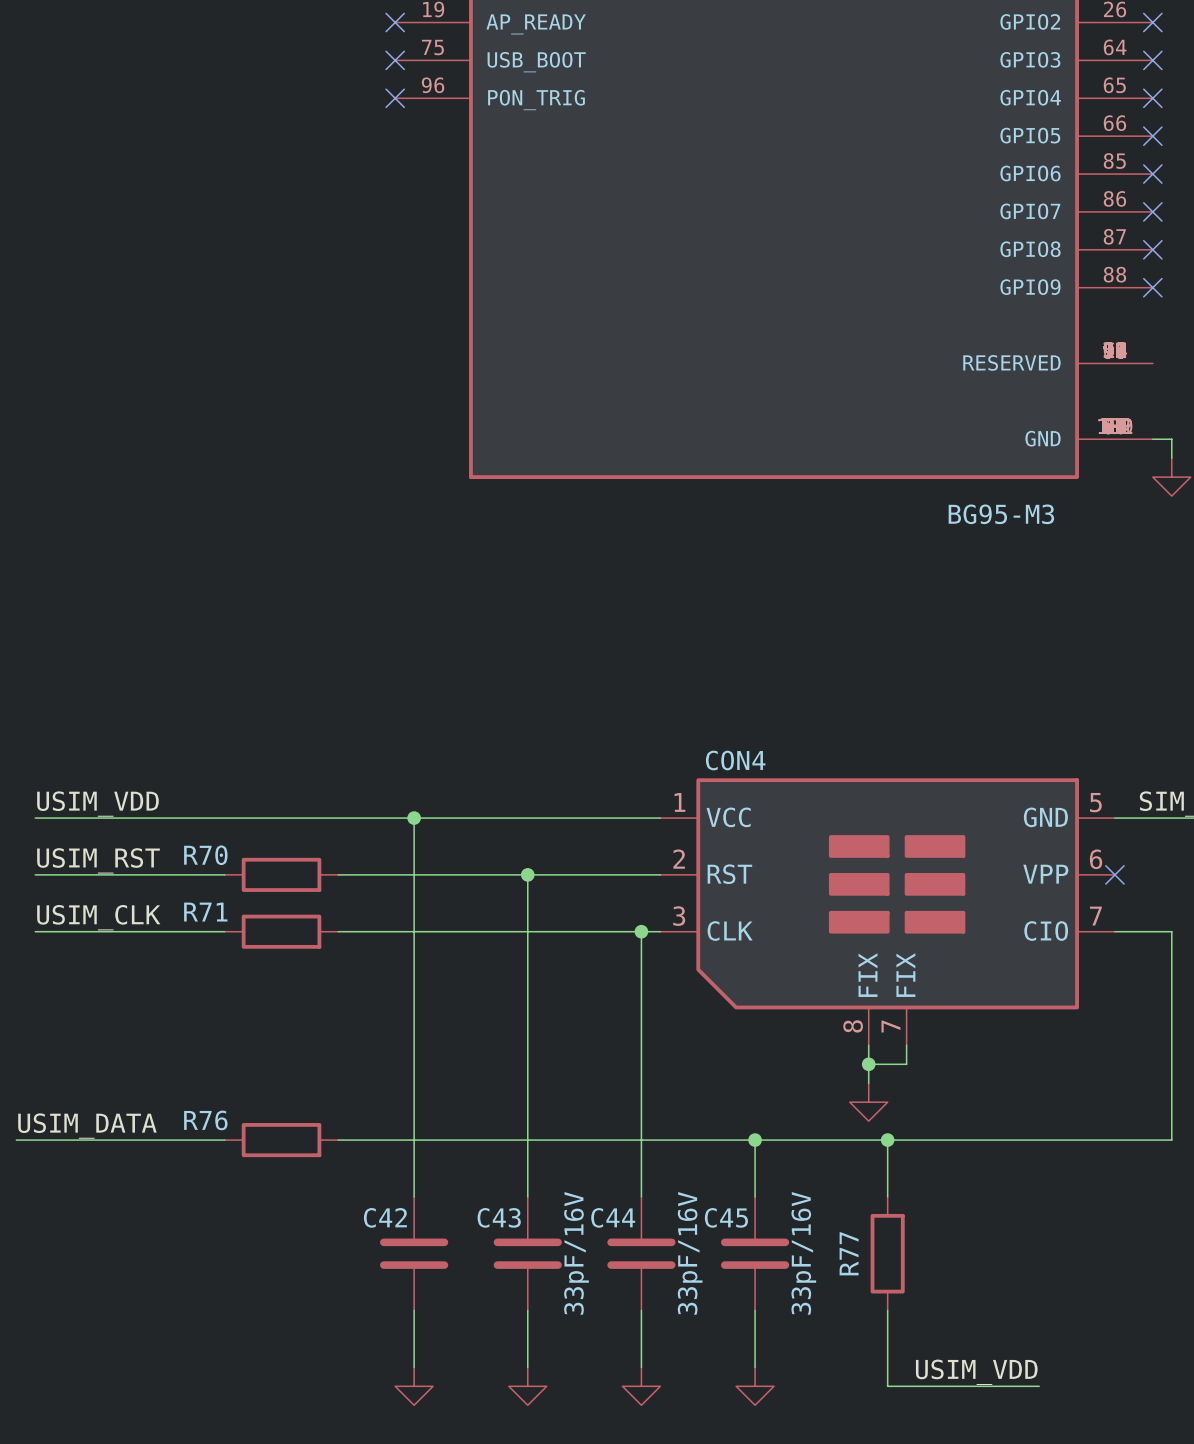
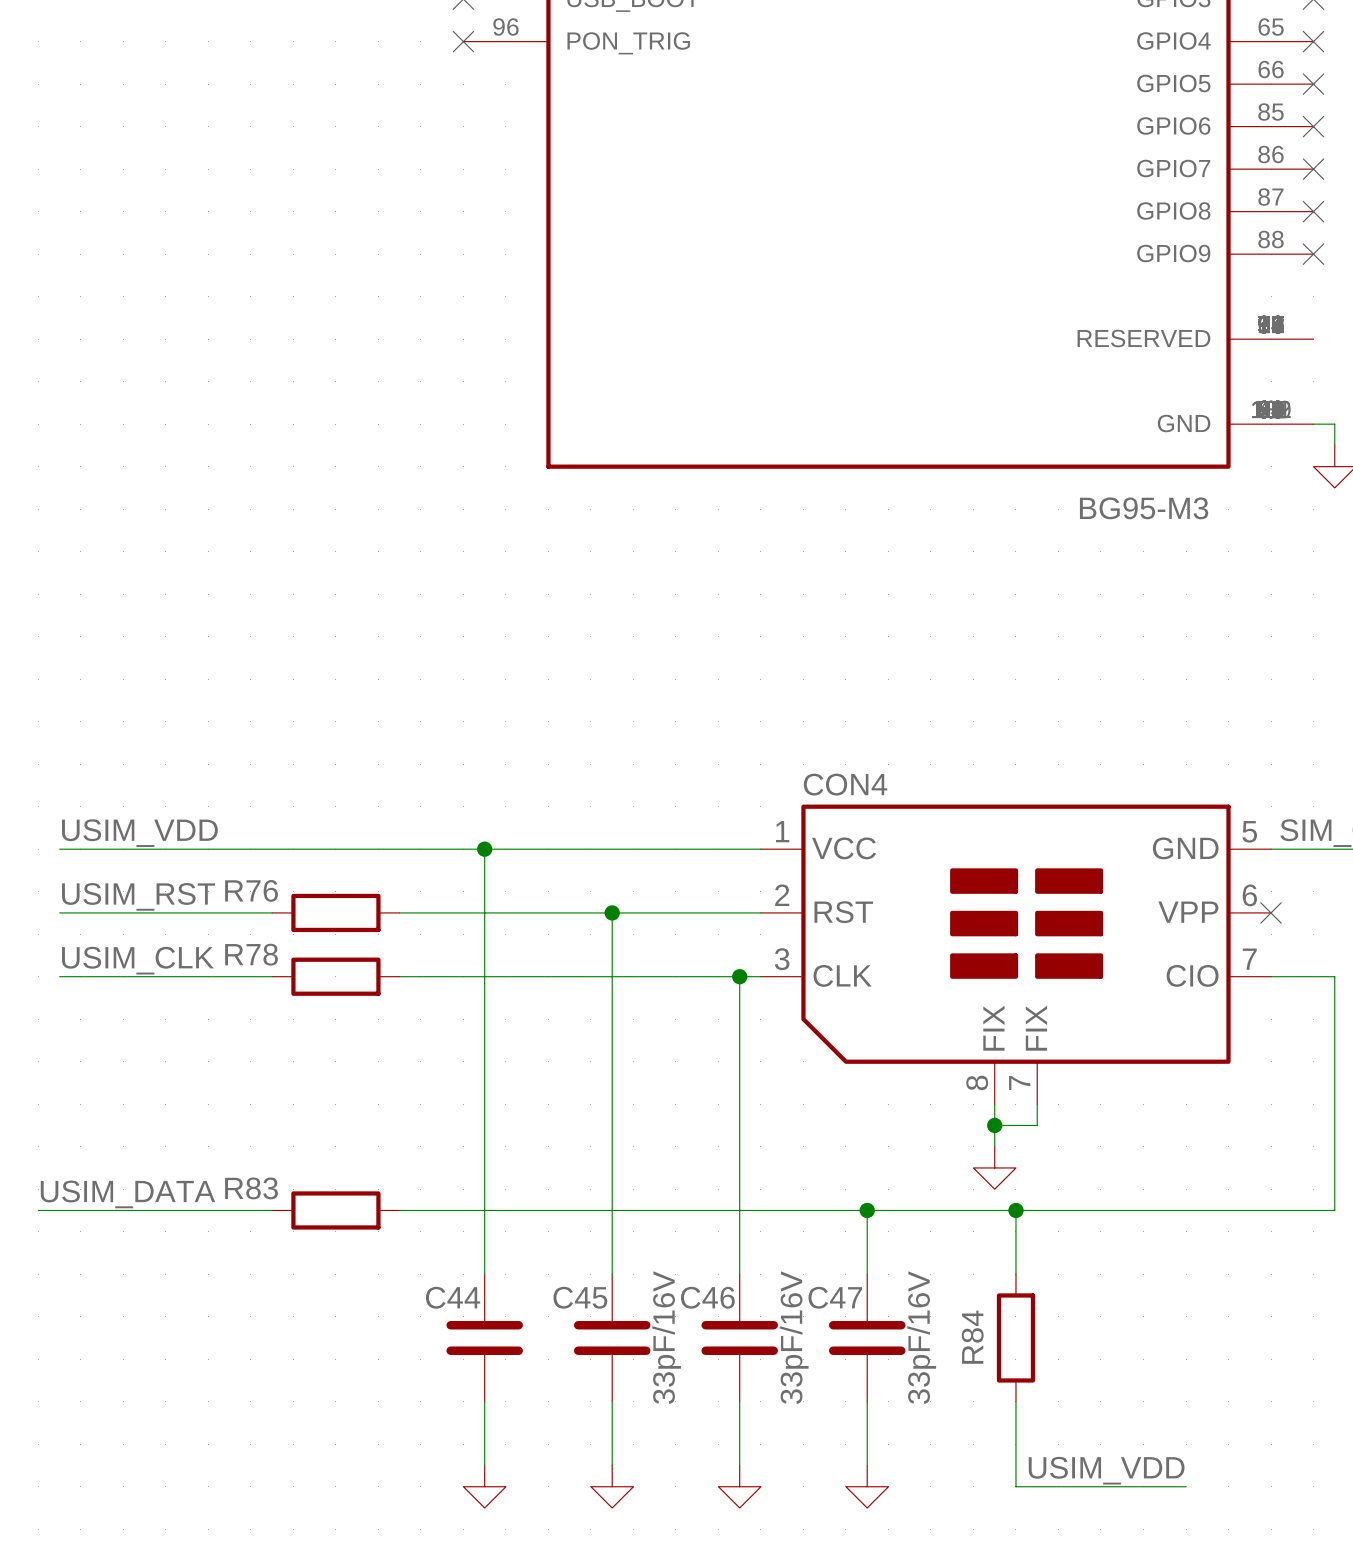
R70 name: R70 (205, 855) -> R76 (251, 890)
R71 name: R71 (205, 912) -> R78 (251, 954)
R76 name: R76 (205, 1120) -> R83 (251, 1188)
C42 name: C42 (385, 1217) -> C44 (453, 1297)
C43 name: C43 (499, 1217) -> C45 (580, 1297)
C44 name: C44 (613, 1217) -> C46 (707, 1297)
C45 name: C45 (726, 1217) -> C47 (835, 1297)
R77 name: R77 (849, 1253) -> R84 (972, 1337)

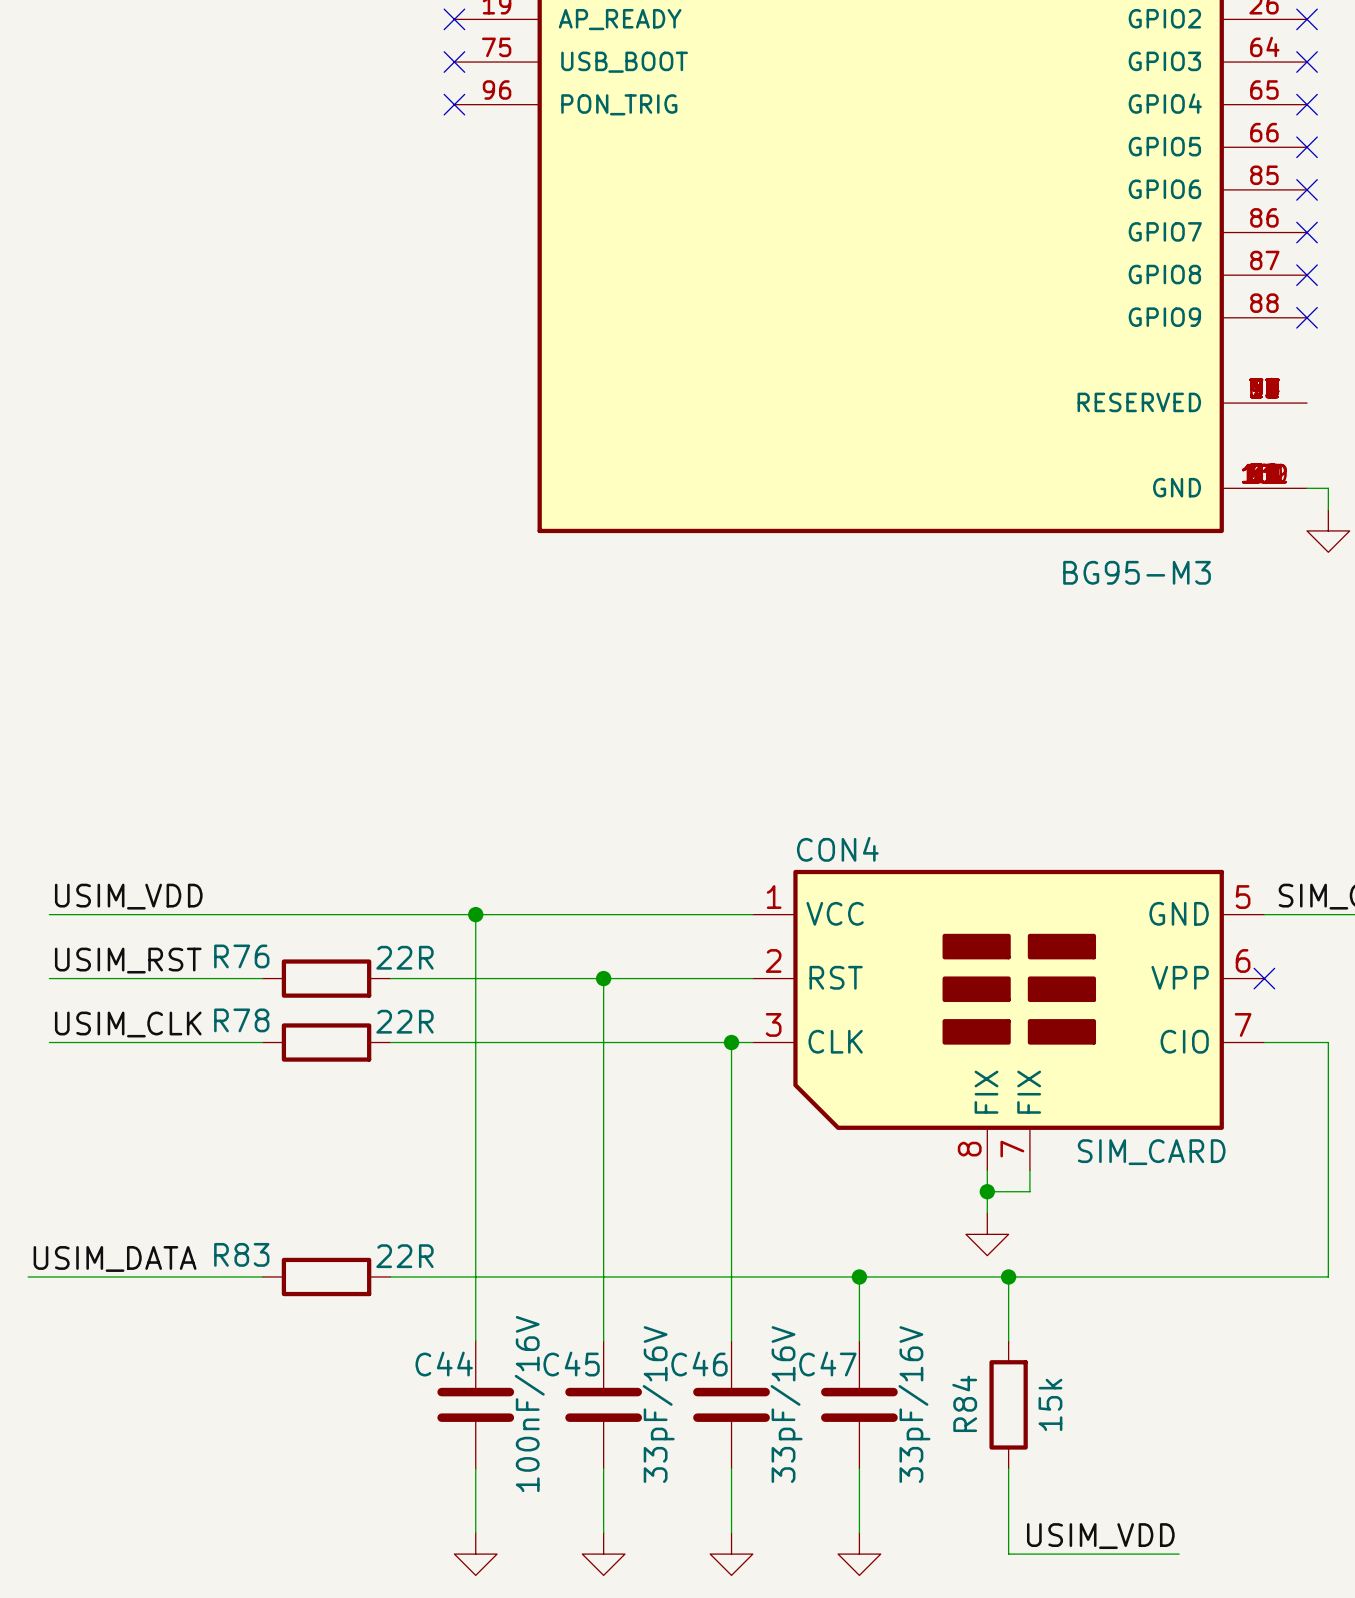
R76 value: none -> 22R (404, 957)
R78 value: none -> 22R (404, 1021)
CON4 value: none -> SIM_CARD (1151, 1152)
R83 value: none -> 22R (404, 1256)
R84 value: none -> 15k (1050, 1404)
C44 value: none -> 100nF/16V (529, 1404)

